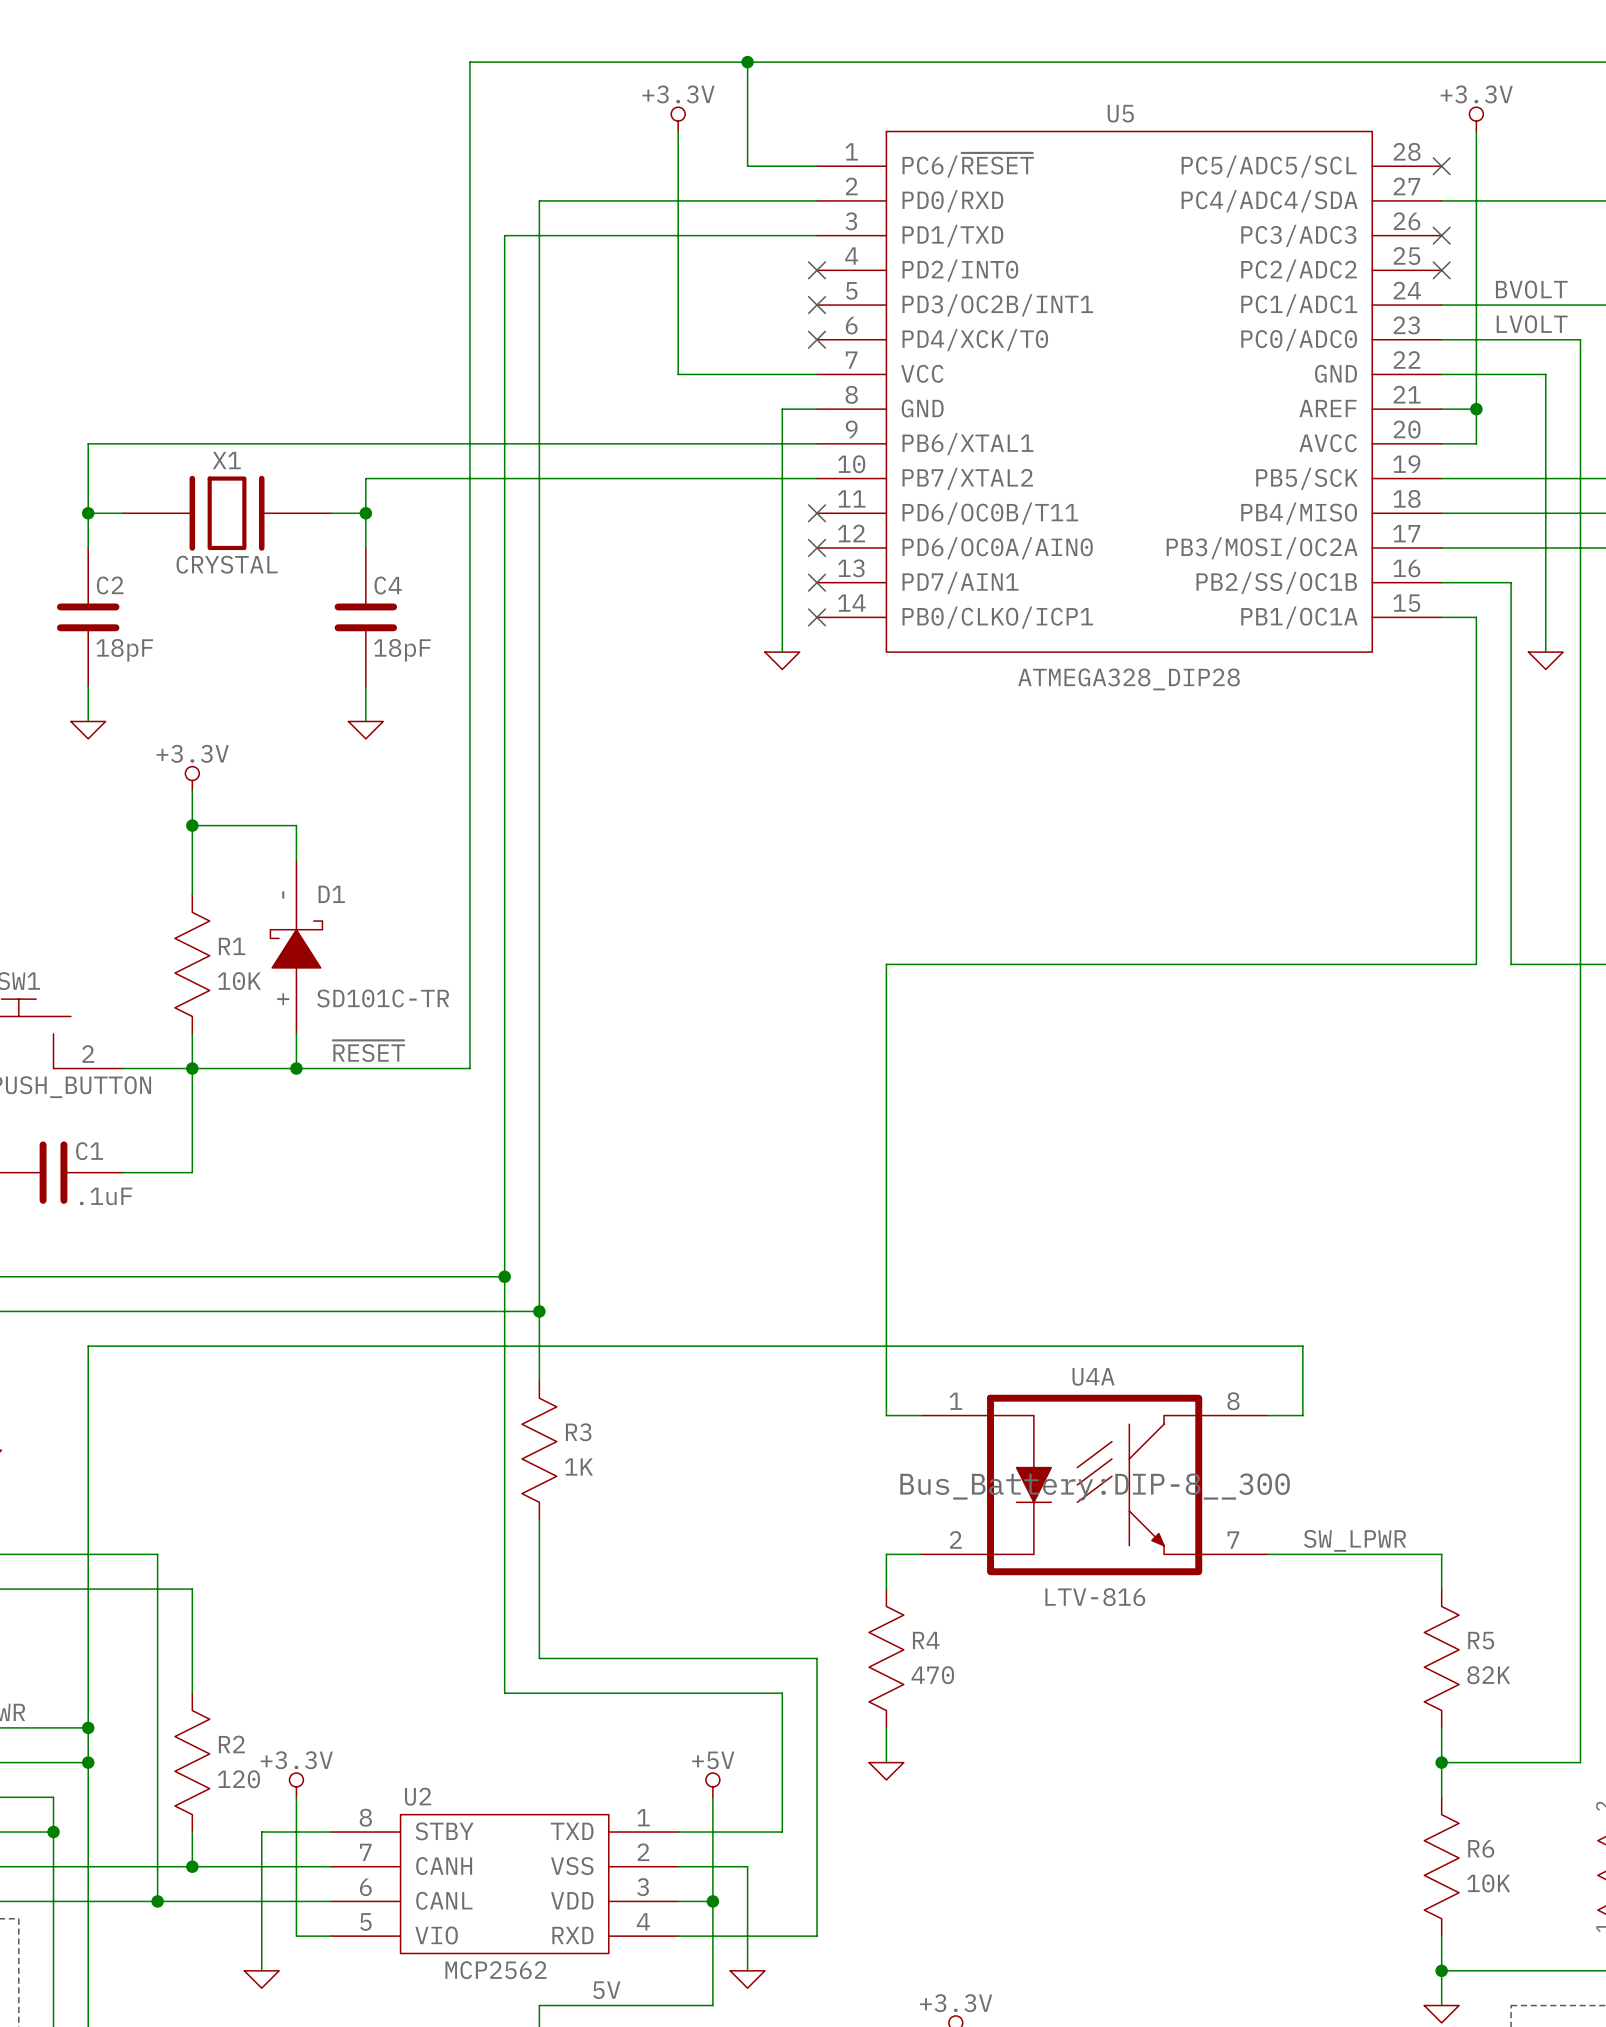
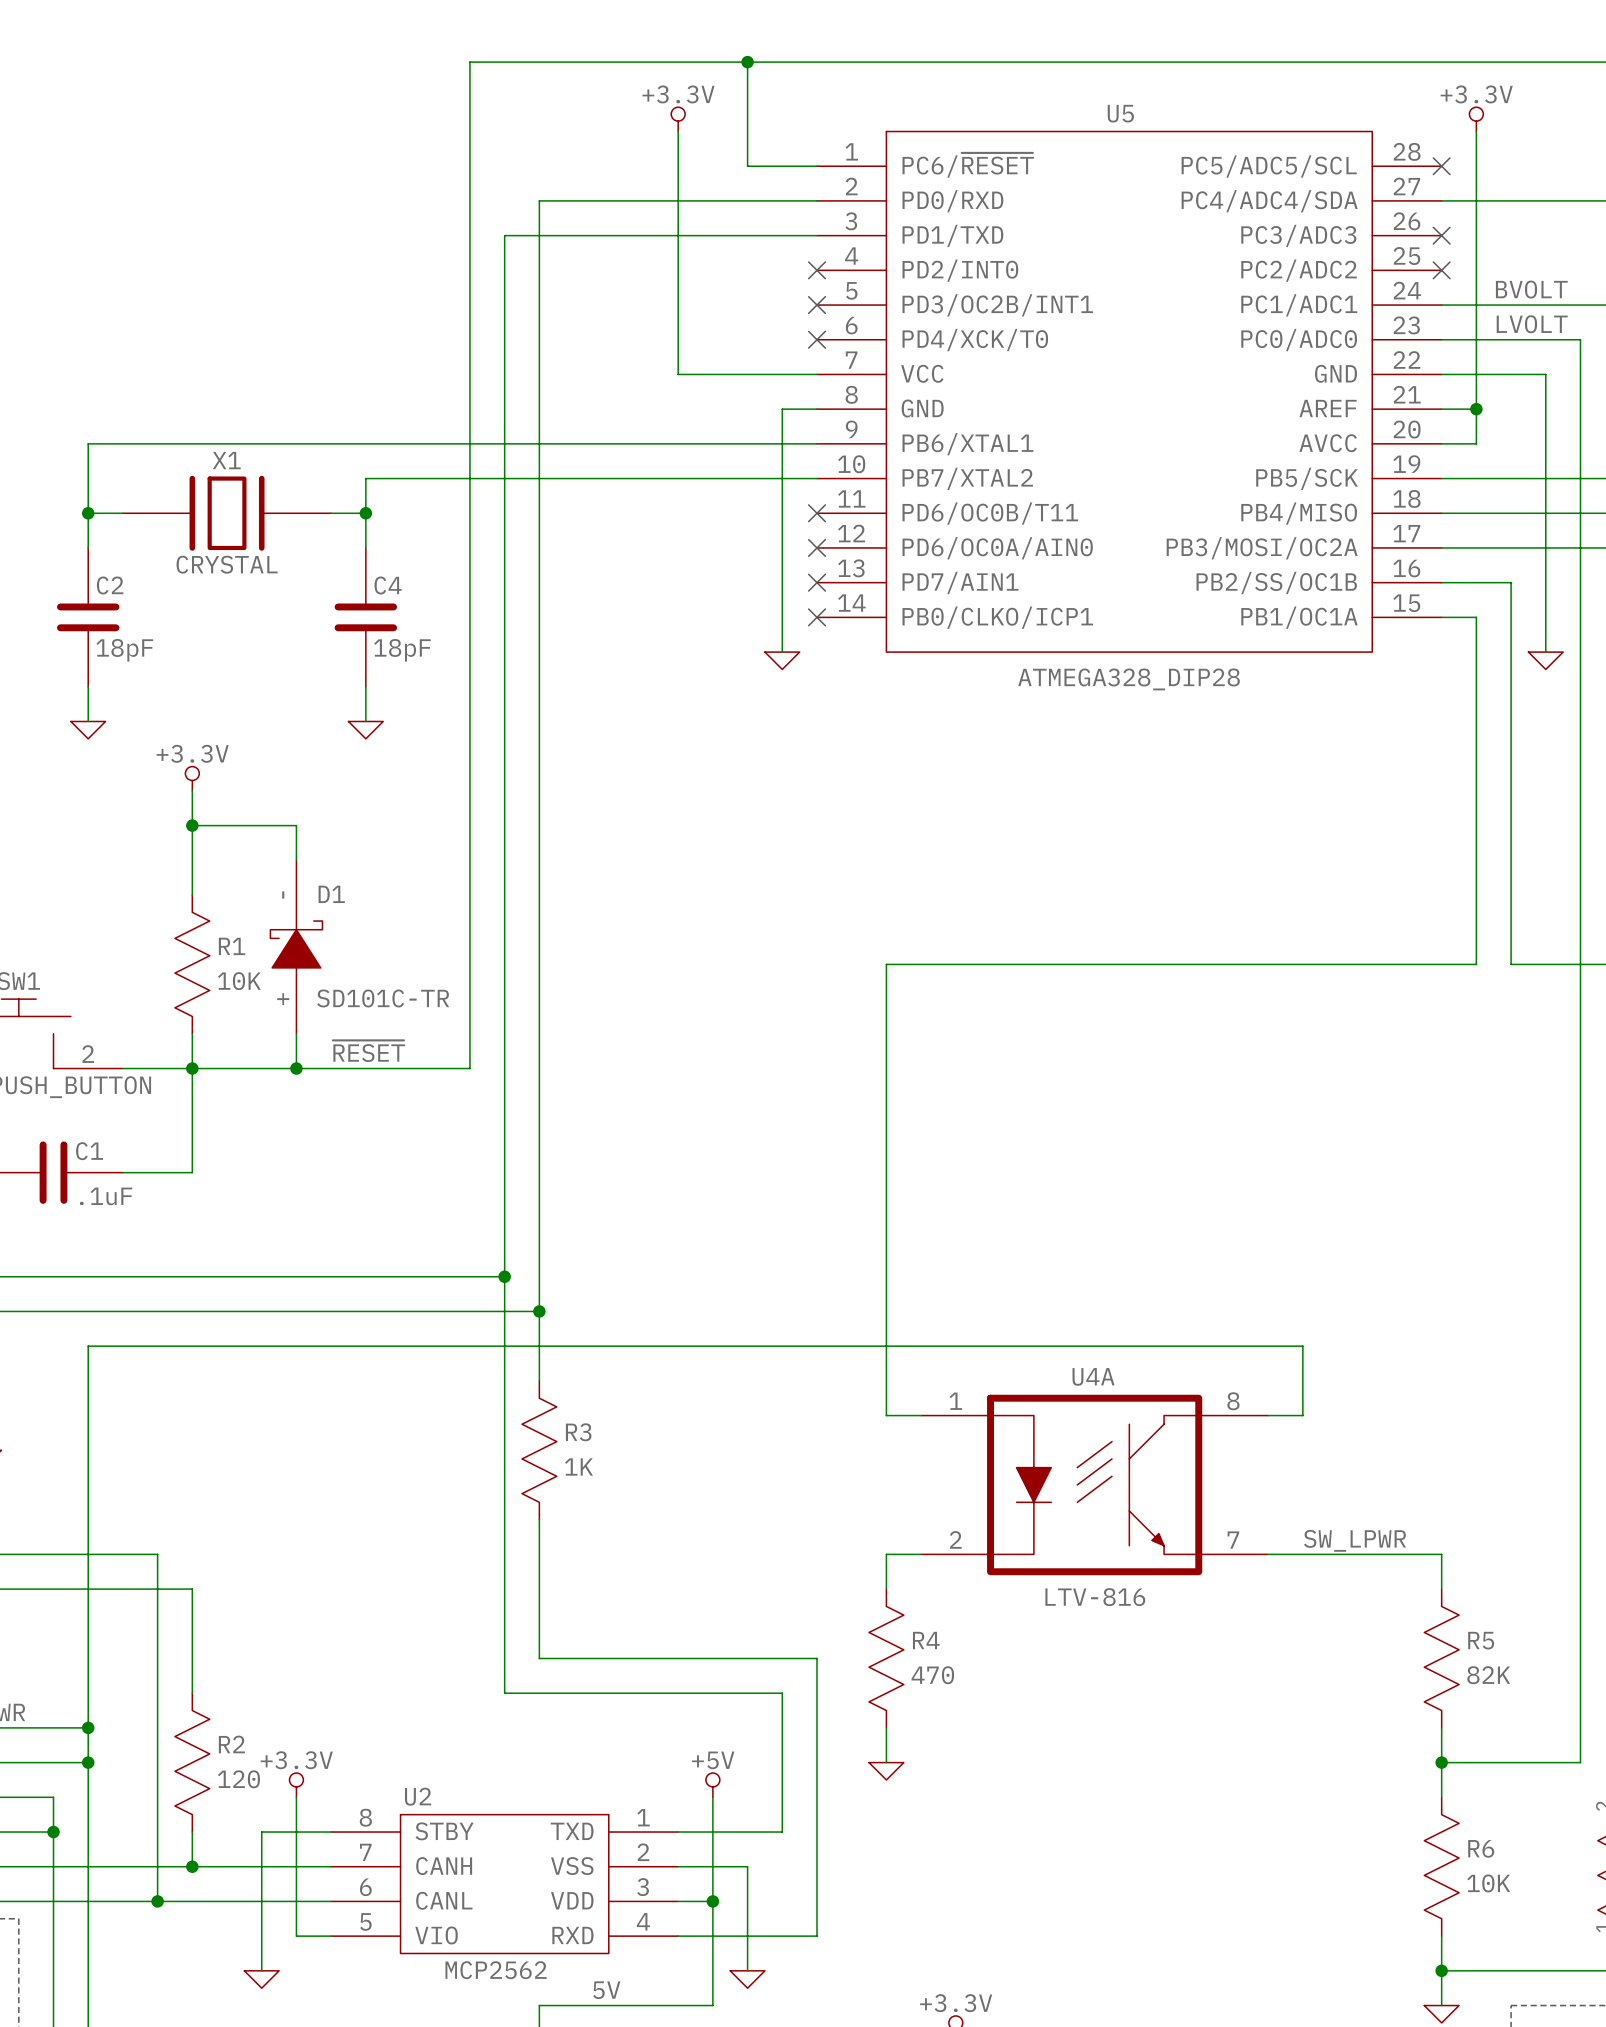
U4A text: Bus_Battery:DIP-8__300 (1095, 1487) -> none

